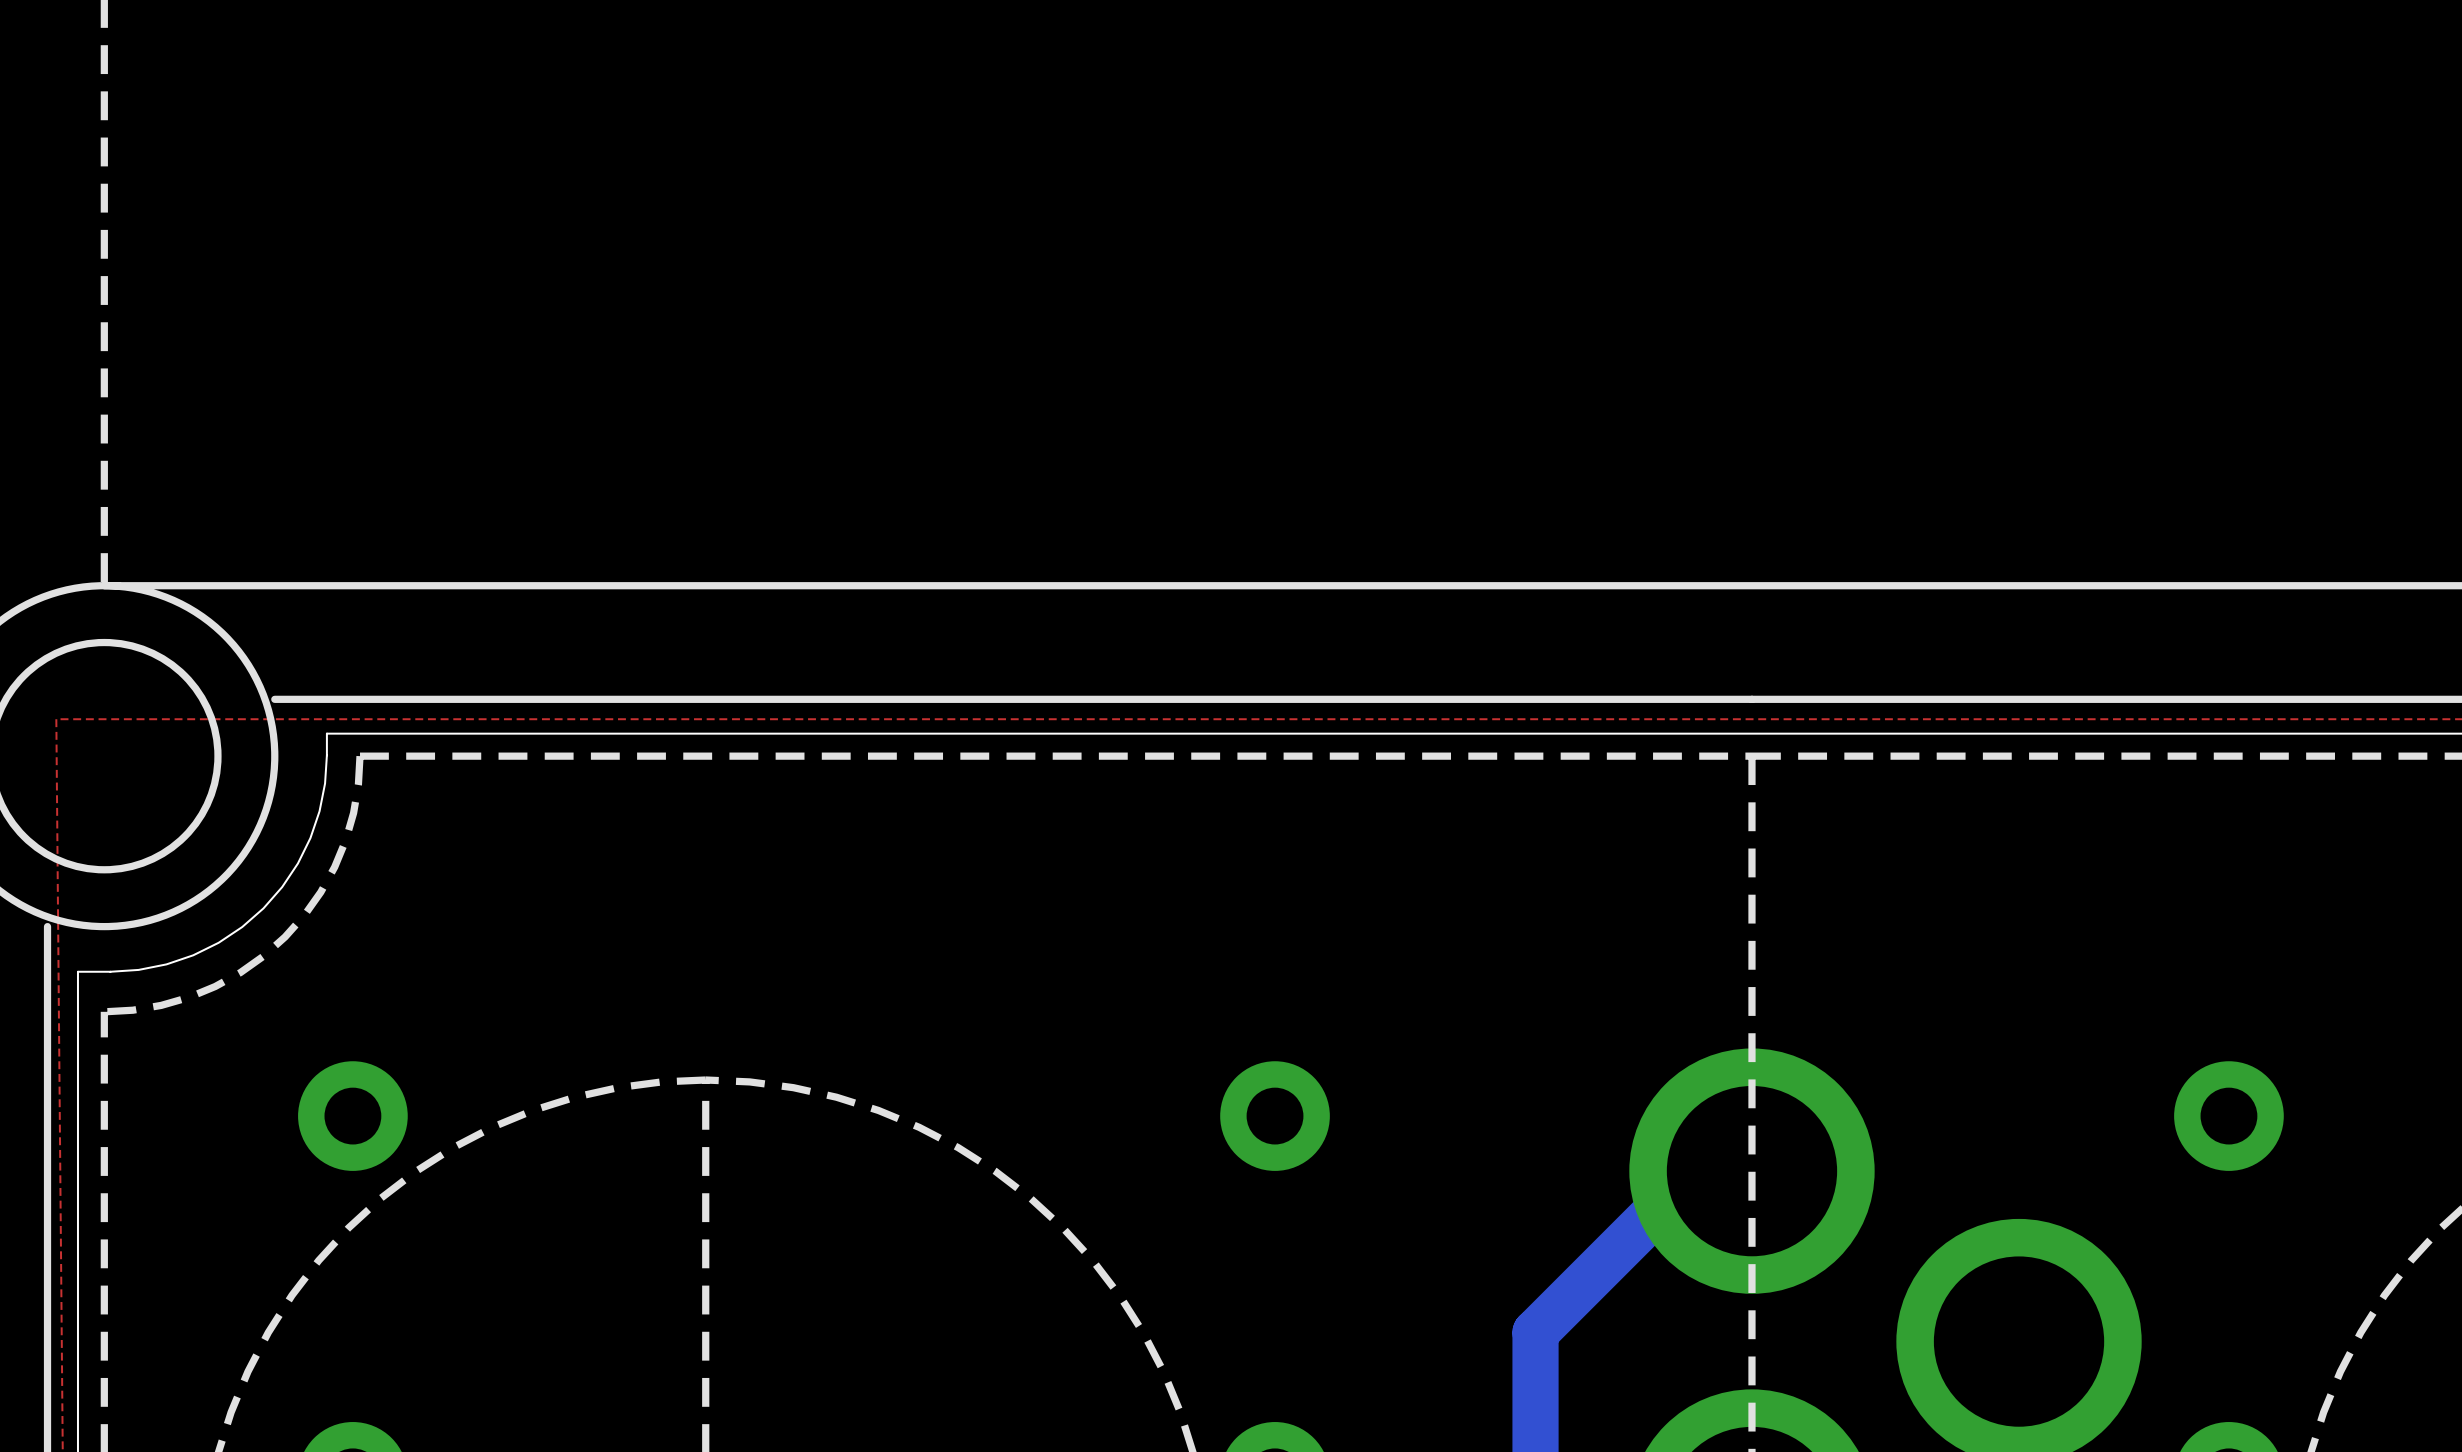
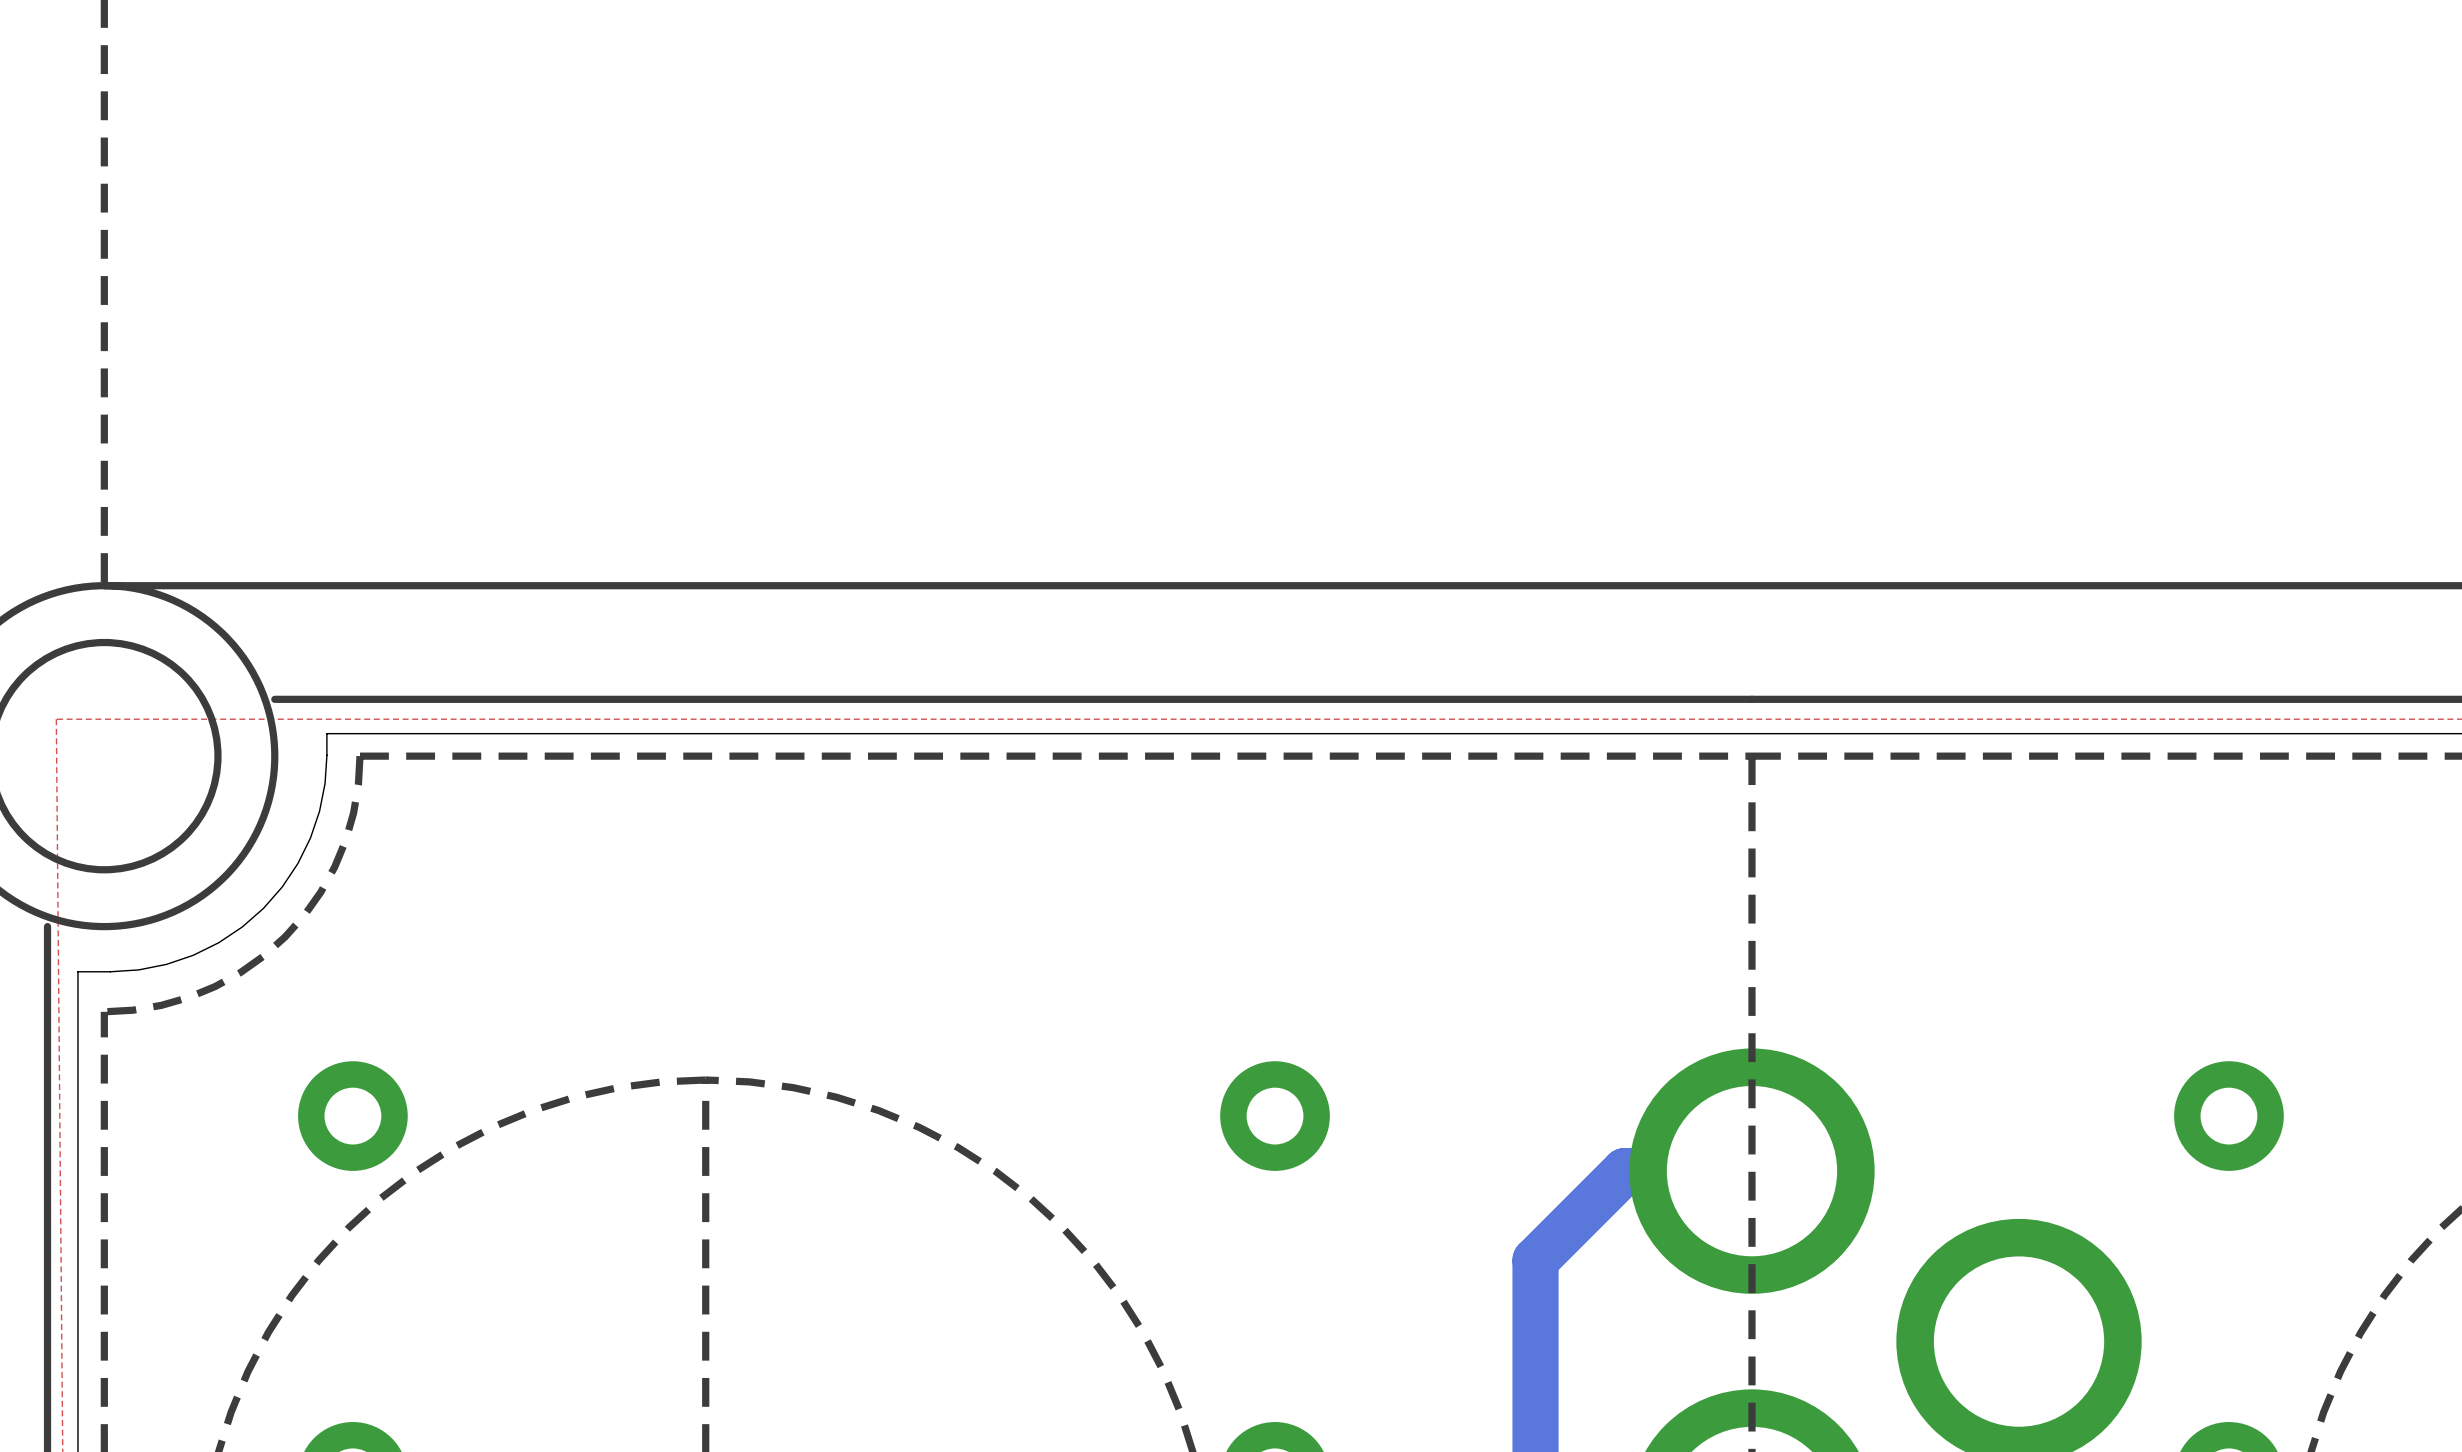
bottom track: (1696, 1171) (1535, 1332) -> (1696, 1171) (1624, 1171) (1535, 1260) (1535, 1332)

